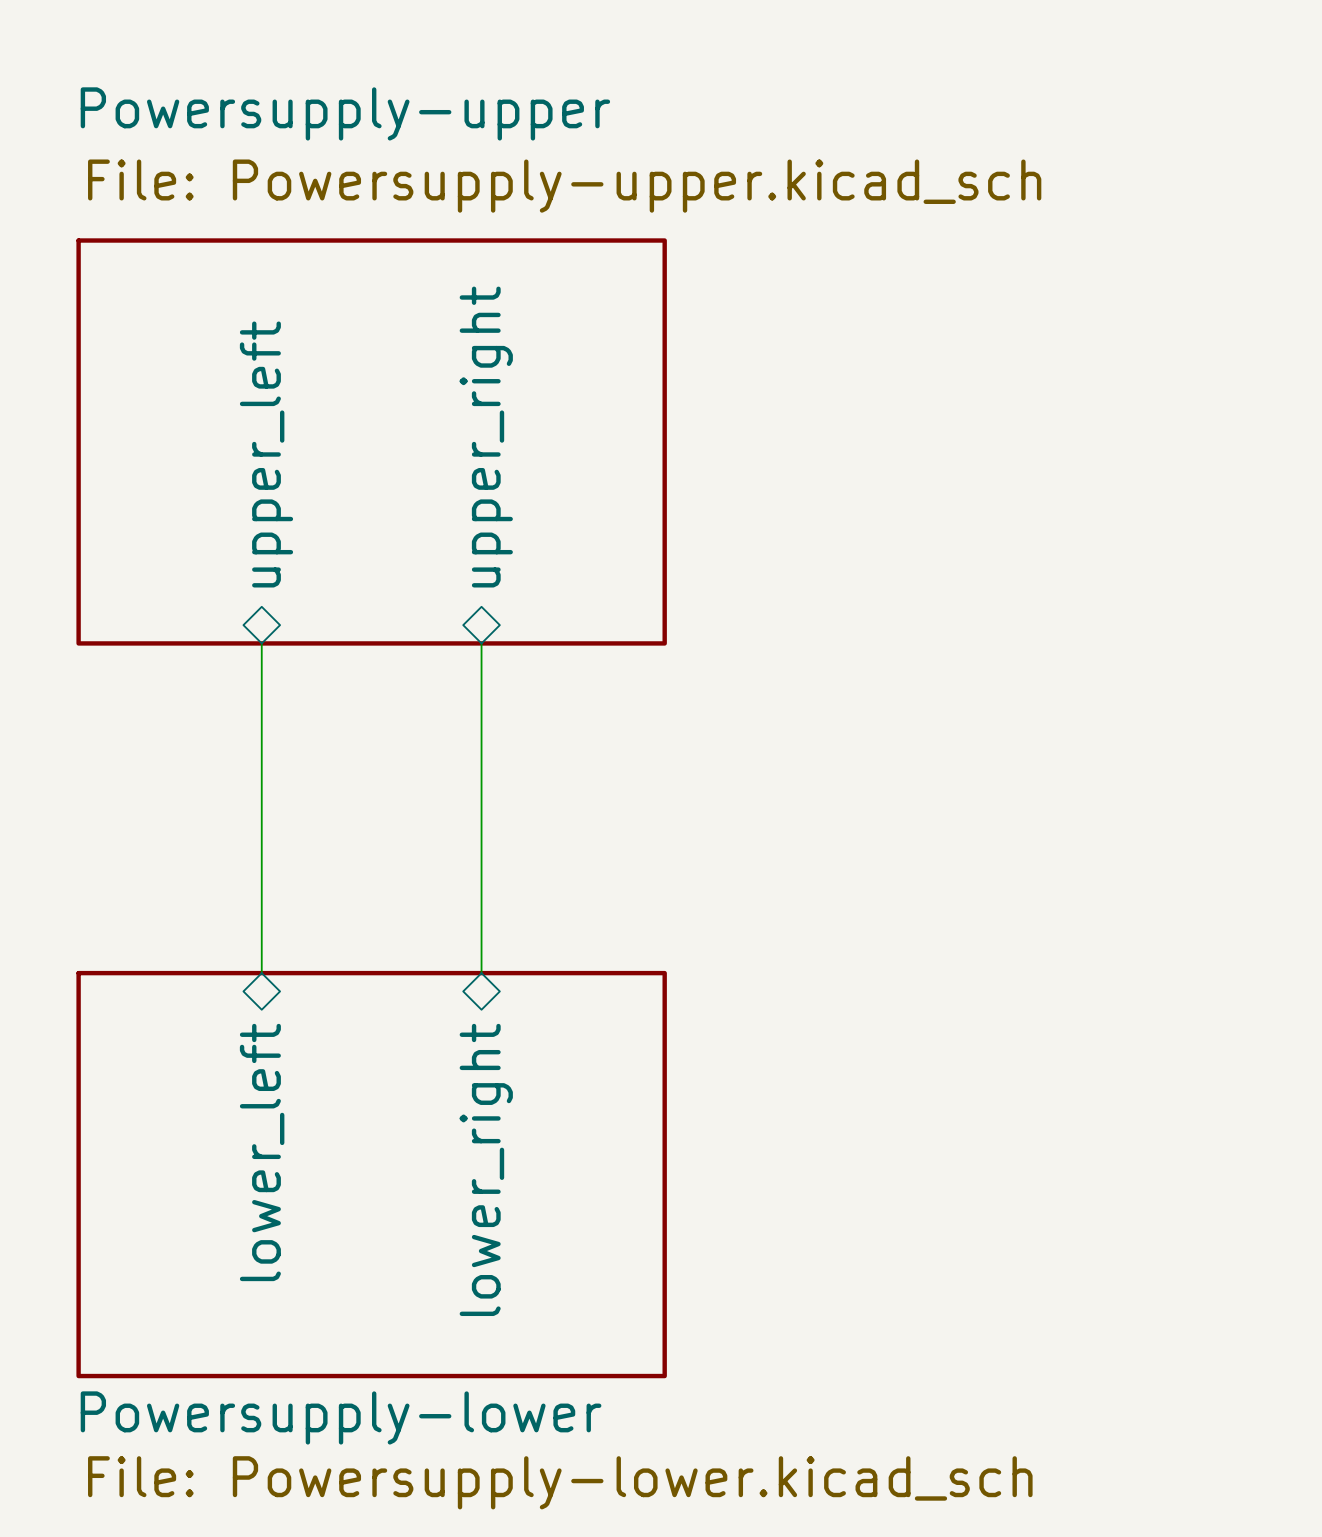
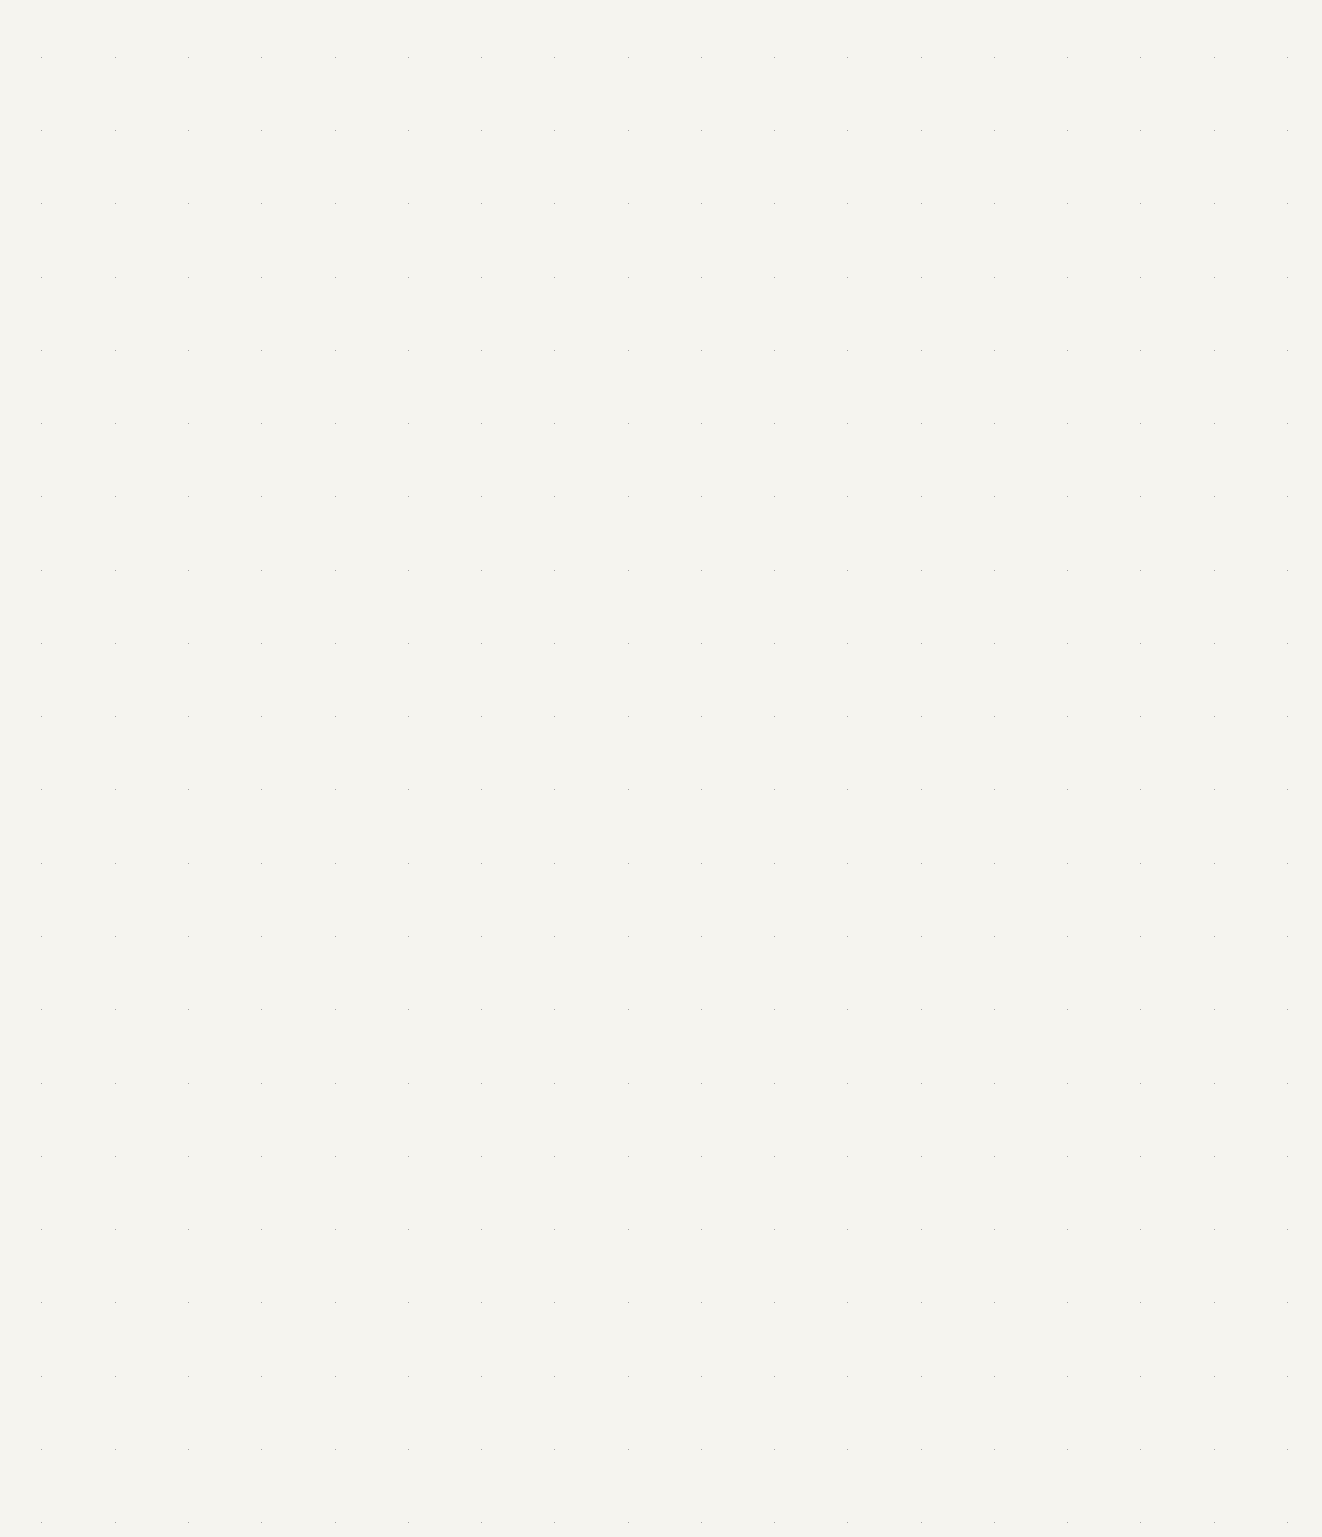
sheet pin: upper_right (486, 437) -> none
sheet Powersupply-upper: File: Powersupply-upper.kicad_sch (371, 441) -> none
sheet pin: upper_left (266, 454) -> none
wire: (261, 643) (261, 973) -> none
wire: (481, 643) (481, 973) -> none
sheet pin: lower_left (262, 1152) -> none
sheet pin: lower_right (486, 1169) -> none
sheet Powersupply-lower: File: Powersupply-lower.kicad_sch (371, 1174) -> none

